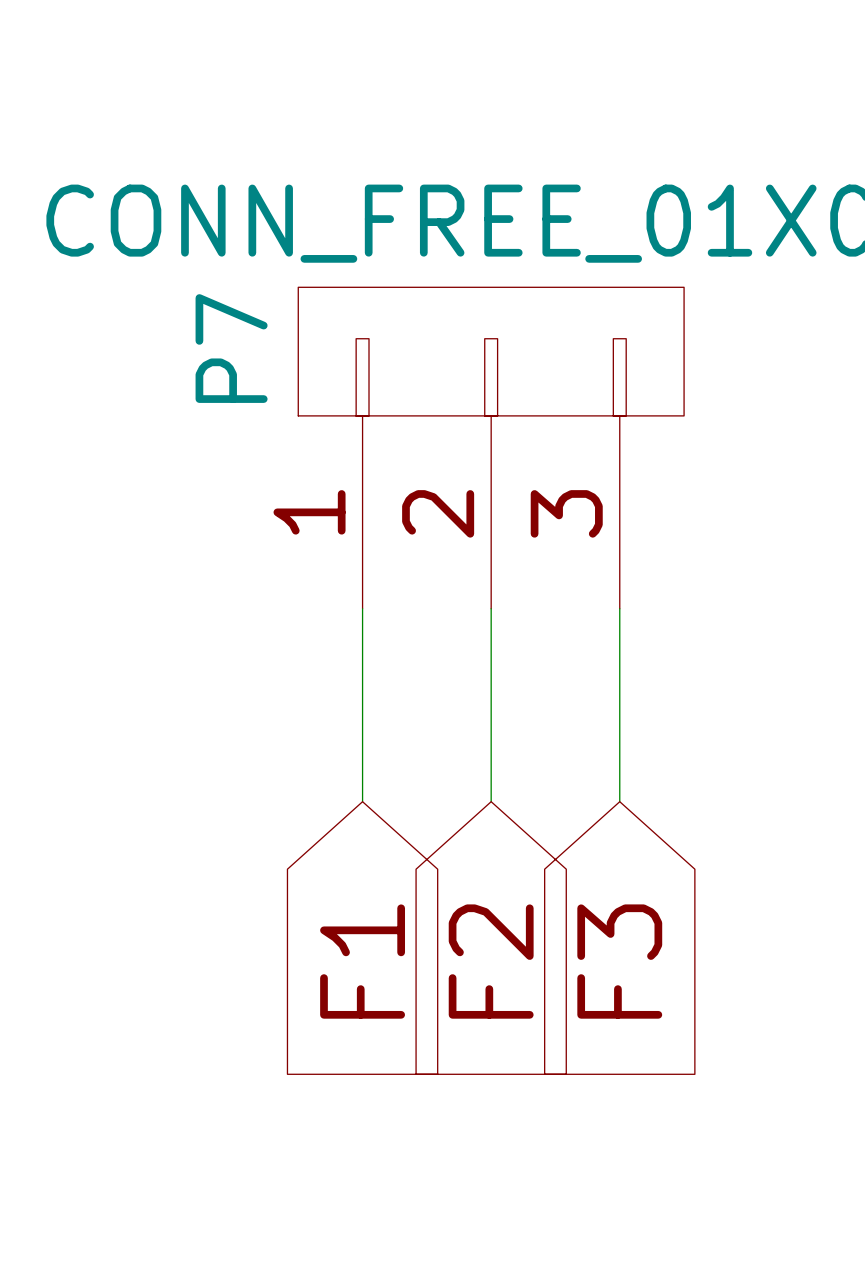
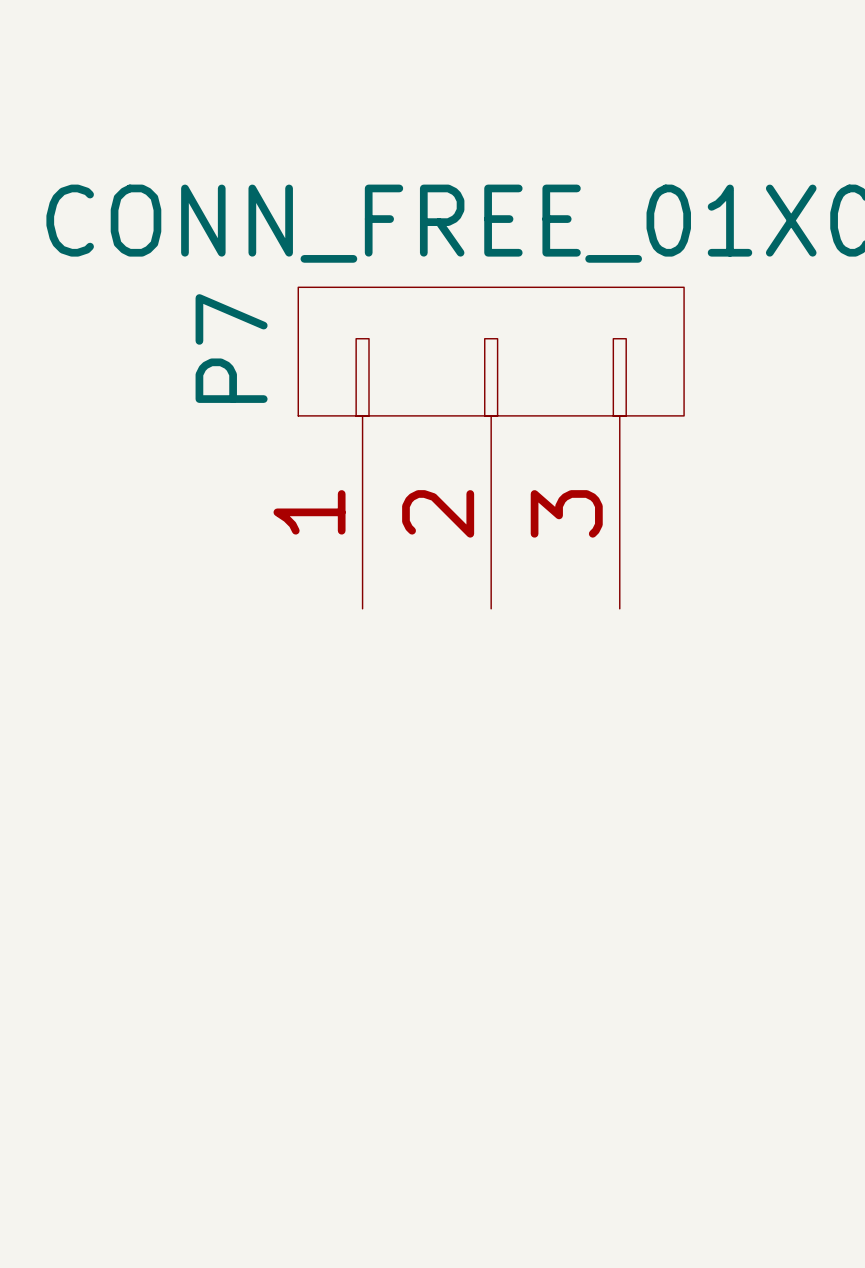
wire: (362, 608) (362, 801) -> none
wire: (491, 608) (491, 801) -> none
wire: (619, 608) (619, 801) -> none
global label: F1 (362, 961) -> none
global label: F2 (491, 961) -> none
global label: F3 (619, 961) -> none

